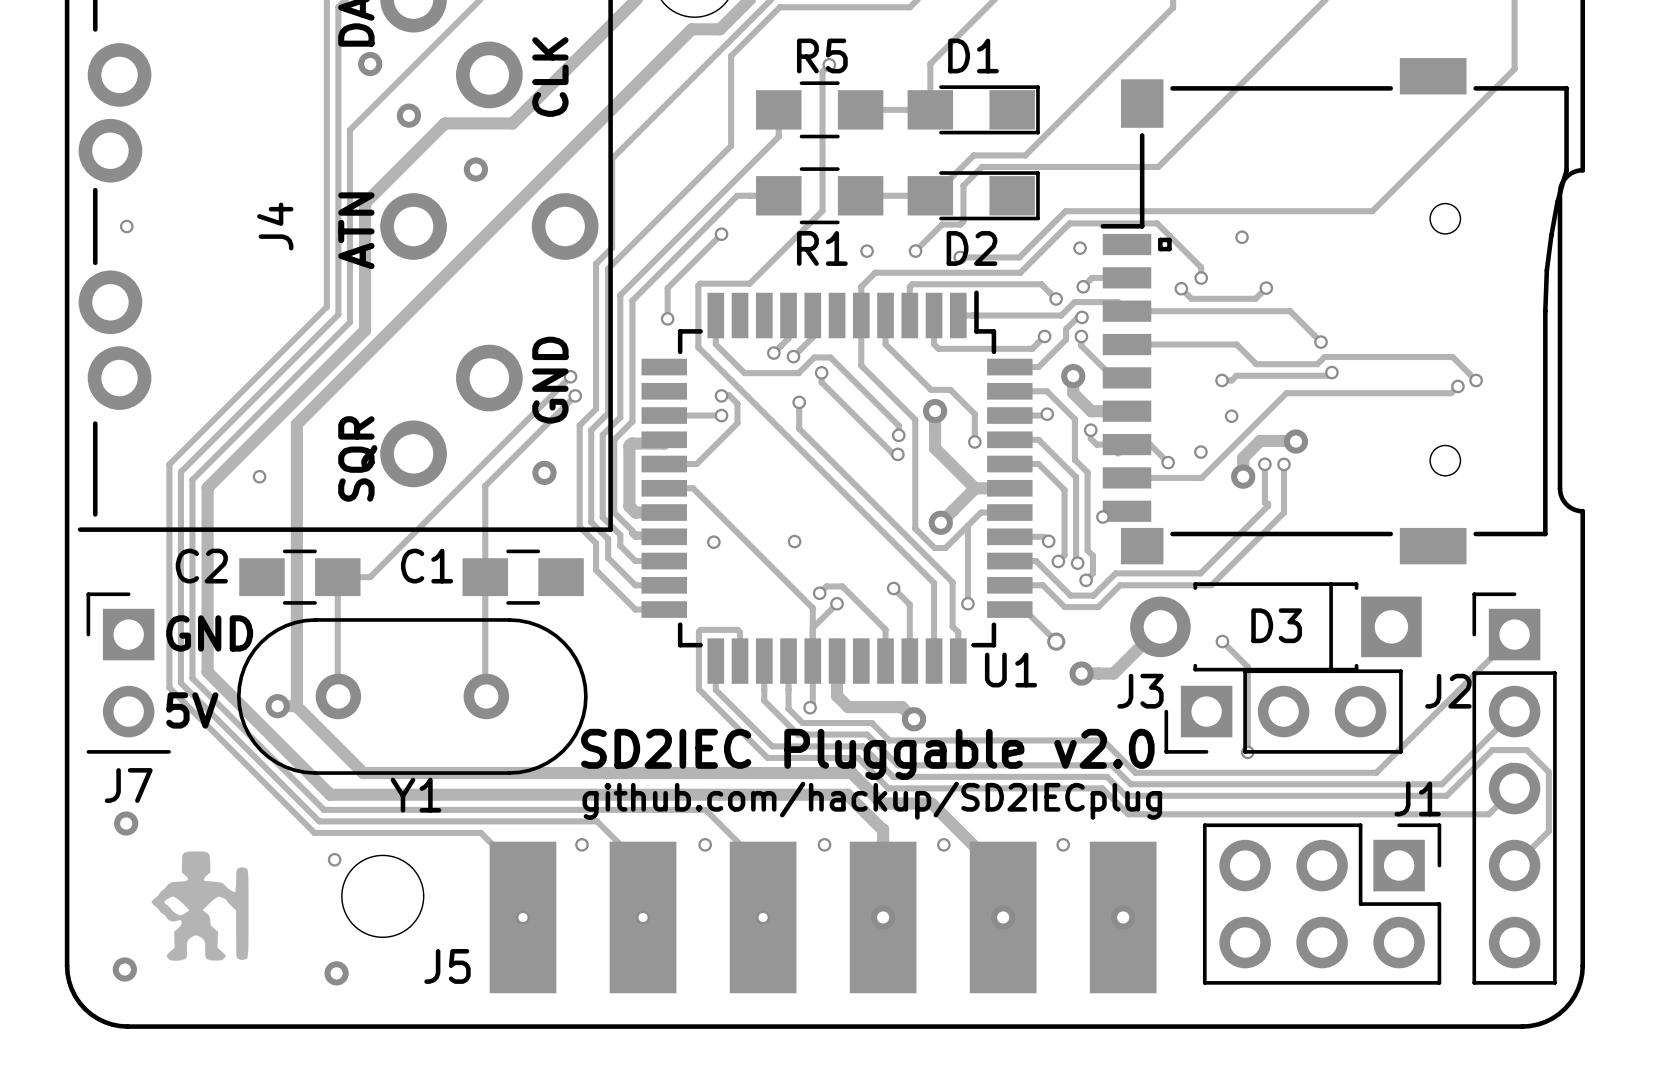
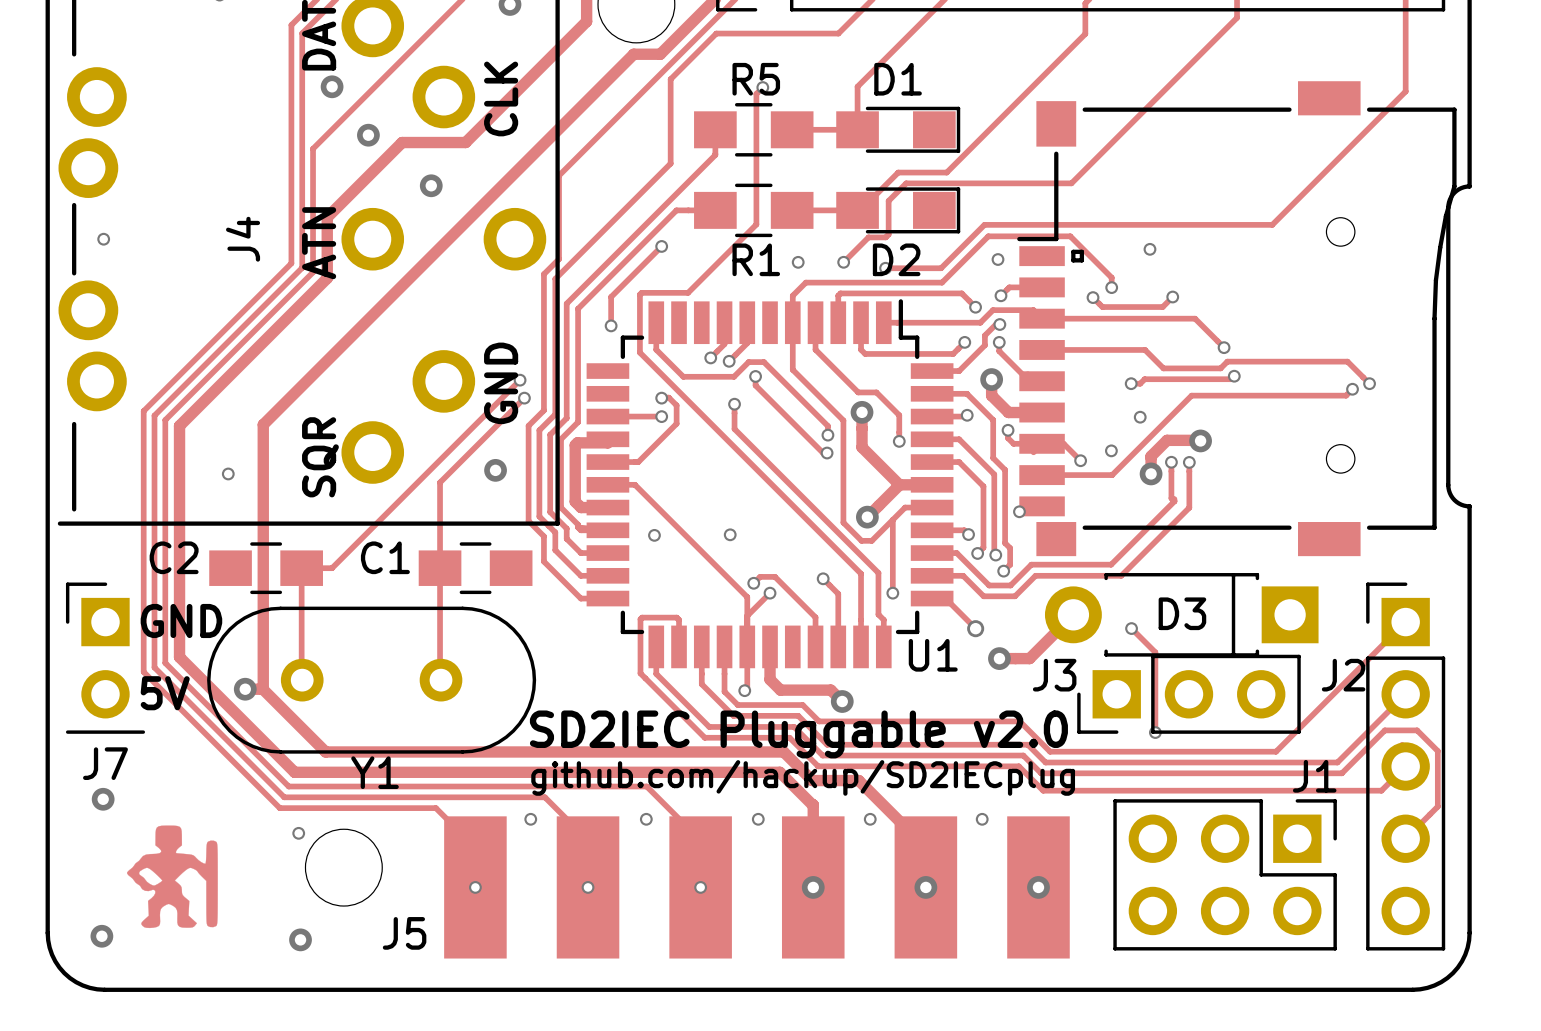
track: (326, 252) (326, 306) (169, 464) -> (291, 263) (143, 411) (143, 462)
track: (338, 257) (338, 314) (180, 472) -> (302, 267) (154, 415) (154, 469)
track: (349, 261) (349, 322) (192, 479) -> (313, 272) (165, 420) (165, 476)
track: (365, 268) (365, 330) (207, 487) -> (327, 278) (179, 425) (179, 484)

